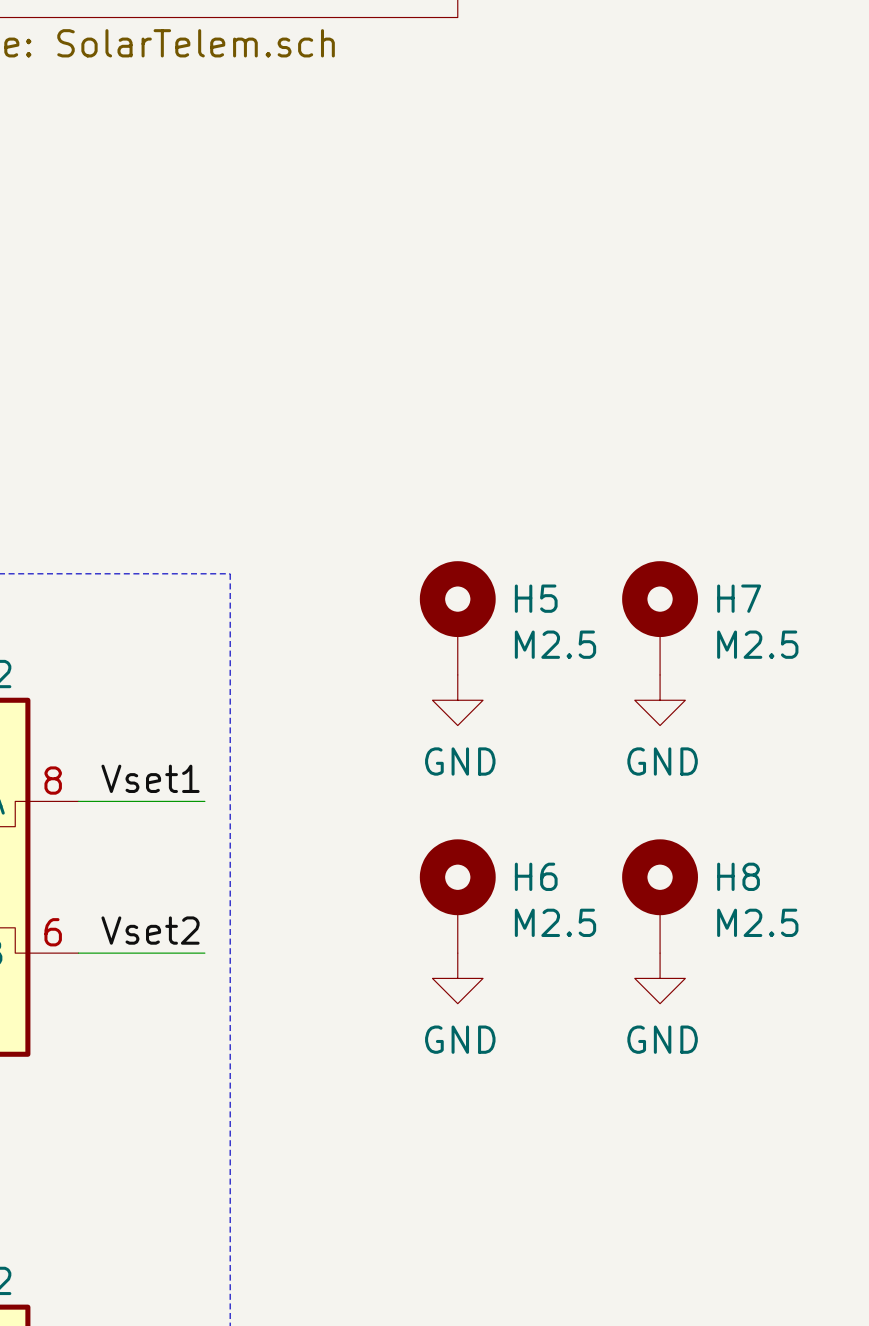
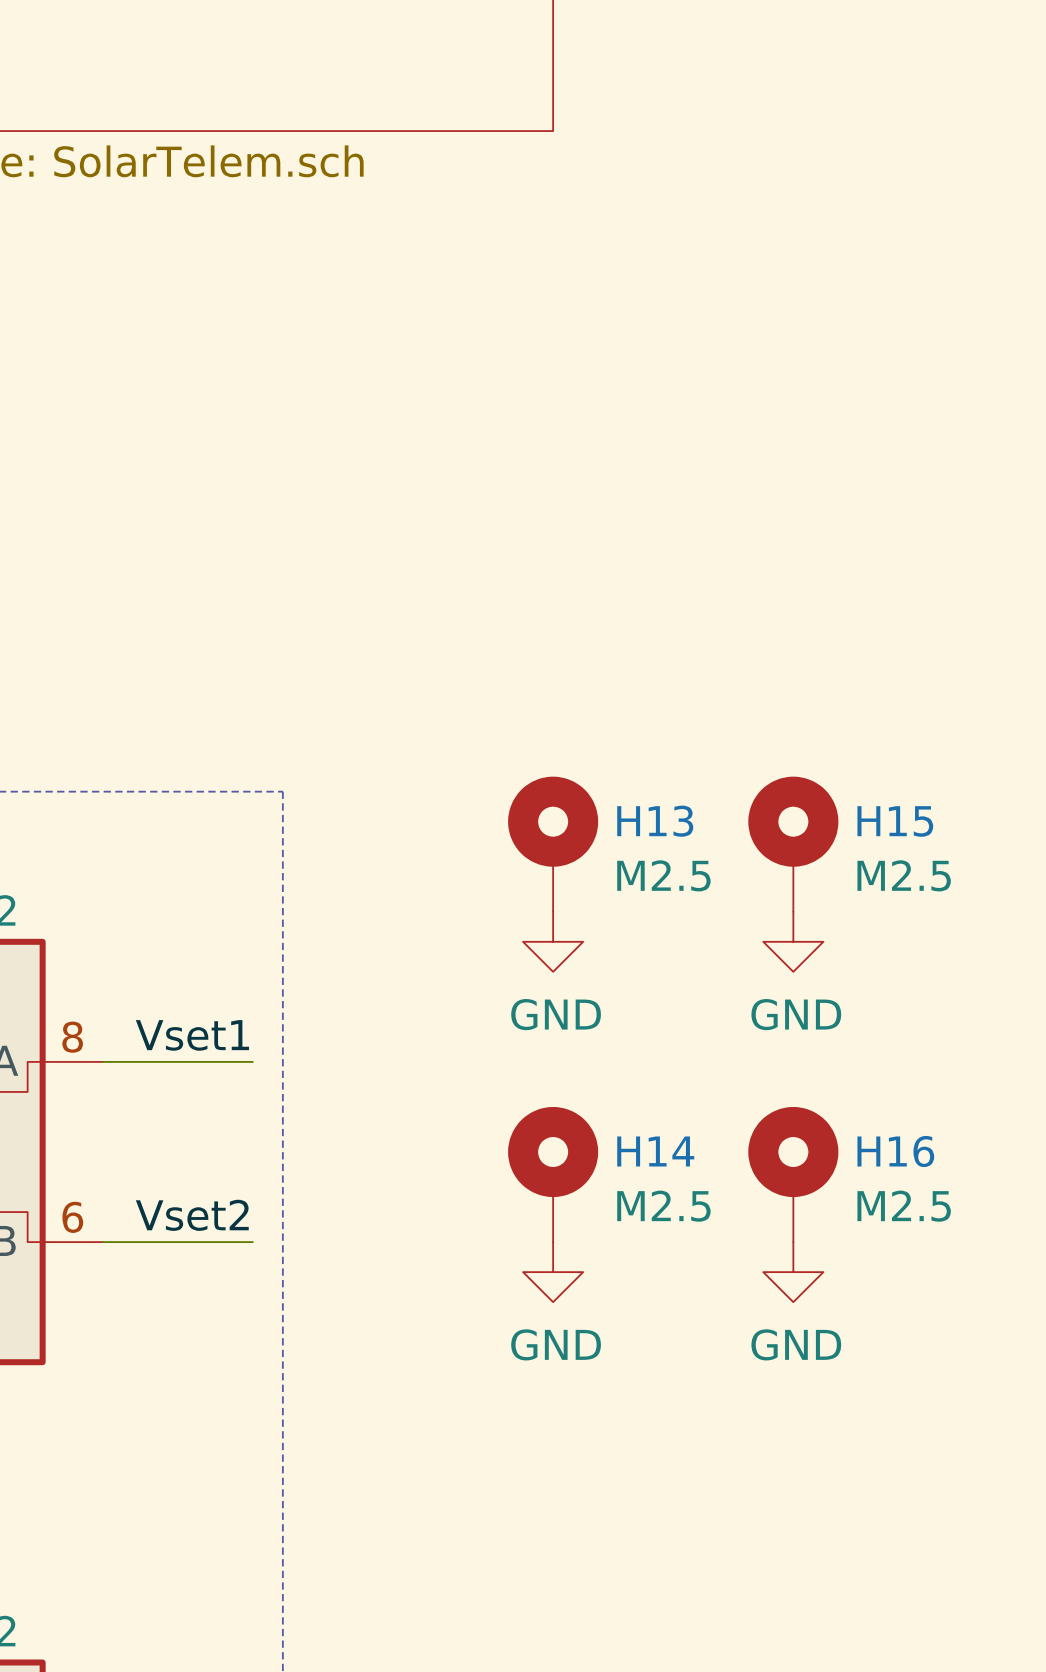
H5 name: H5 (536, 598) -> H13 (655, 821)
H7 name: H7 (739, 598) -> H15 (895, 821)
H6 name: H6 (536, 876) -> H14 (655, 1151)
H8 name: H8 (738, 876) -> H16 (895, 1151)

